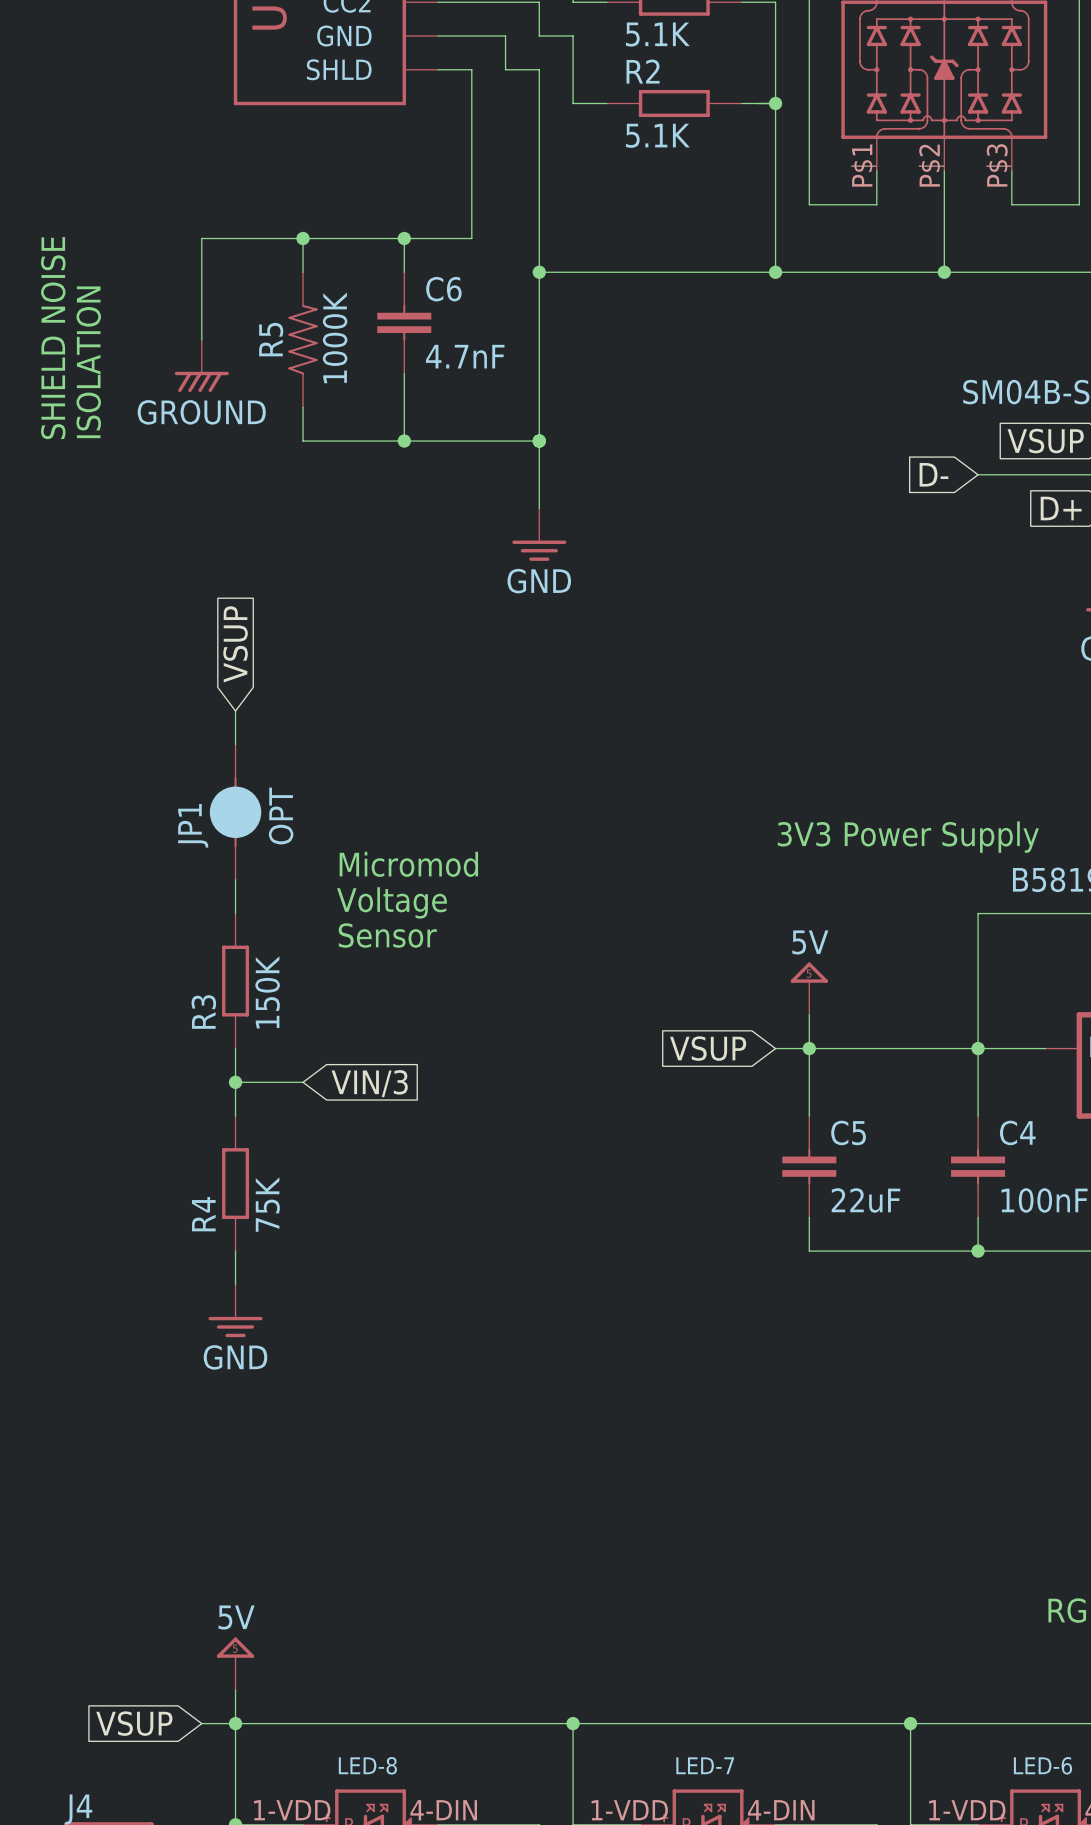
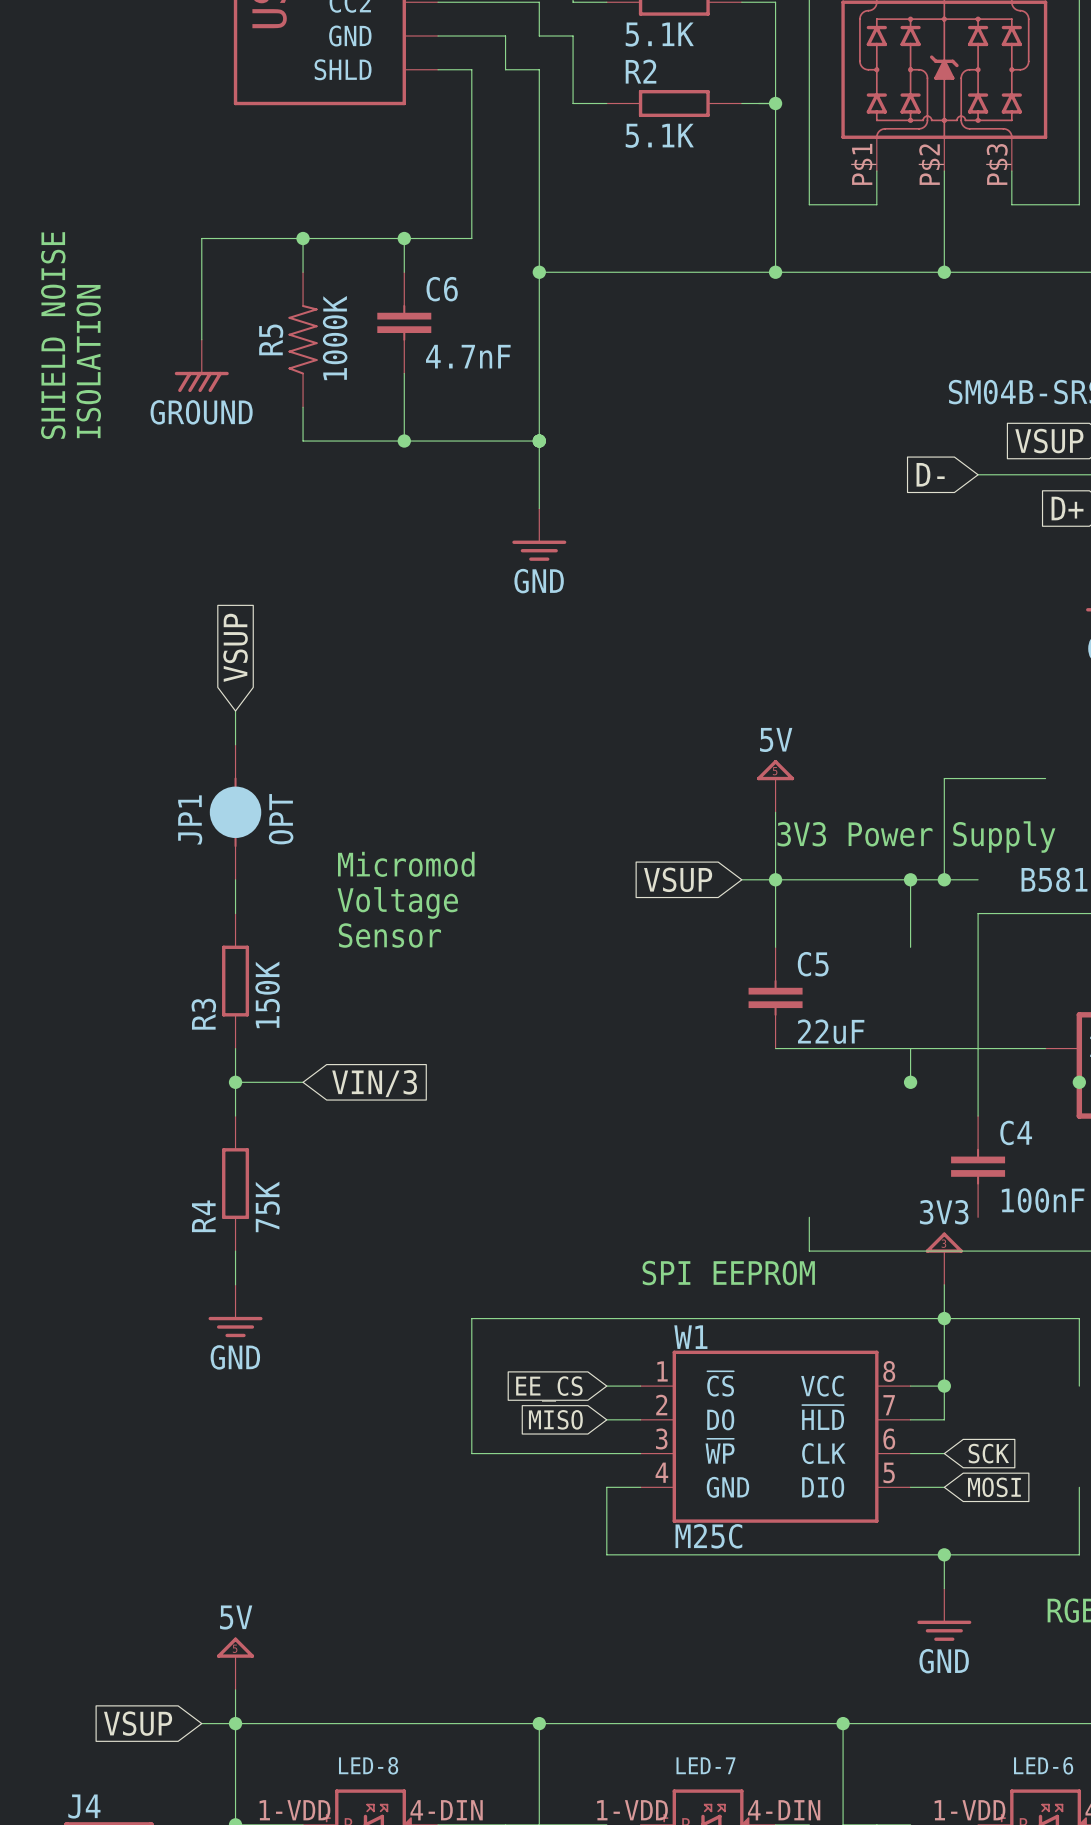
wire: none -> (1045, 778) (944, 778) (944, 879)
wire: none -> (775, 812) (775, 947)
wire: none -> (741, 879) (978, 879)
junction: none -> (775, 879)
wire: none -> (910, 879) (910, 947)
junction: none -> (910, 879)
junction: none -> (944, 879)
power symbol position: 5V (809, 988) -> 5V (775, 786)
wire: (809, 1014) (809, 1116) -> none
global label position: VSUP (708, 1048) -> VSUP (678, 879)
junction: (809, 1048) -> none
junction: (978, 1048) -> none
junction: none -> (910, 1082)
junction: none -> (1079, 1082)
C5 position: (809, 1166) -> (775, 997)
wire: (978, 1217) (978, 1251) -> (910, 1048) (910, 1082)
junction: (978, 1251) -> none
power symbol: none -> 3V3 (944, 1258)
text: none -> SPI EEPROM (728, 1273)
wire: none -> (944, 1284) (944, 1419) (910, 1419)
junction: none -> (944, 1318)
wire: none -> (606, 1386) (640, 1386)
wire: none -> (910, 1386) (944, 1386)
junction: none -> (944, 1386)
wire: none -> (1079, 1386) (1079, 1318) (471, 1318) (471, 1453) (640, 1453)
global label: none -> EE_CS (549, 1388)
global label: none -> MISO (555, 1419)
wire: none -> (606, 1419) (640, 1419)
W1: none -> M25C (775, 1436)
wire: none -> (910, 1453) (944, 1453)
global label: none -> SCK (988, 1453)
wire: none -> (640, 1487) (606, 1487) (606, 1554) (1079, 1554) (1079, 1487)
wire: none -> (910, 1487) (944, 1487)
global label: none -> MOSI (994, 1487)
wire: none -> (944, 1554) (944, 1588)
junction: none -> (944, 1554)
power symbol: none -> GND (944, 1614)
wire: (573, 1723) (573, 1824) -> (539, 1723) (539, 1824) (573, 1824)
junction position: (573, 1723) -> (539, 1723)
wire: (910, 1723) (910, 1824) (978, 1824) -> none
junction position: (910, 1723) -> (843, 1723)
wire: (606, 1824) (640, 1824) -> (876, 1824) (910, 1824)
wire: (809, 1824) (843, 1824) -> (843, 1723) (843, 1824)

